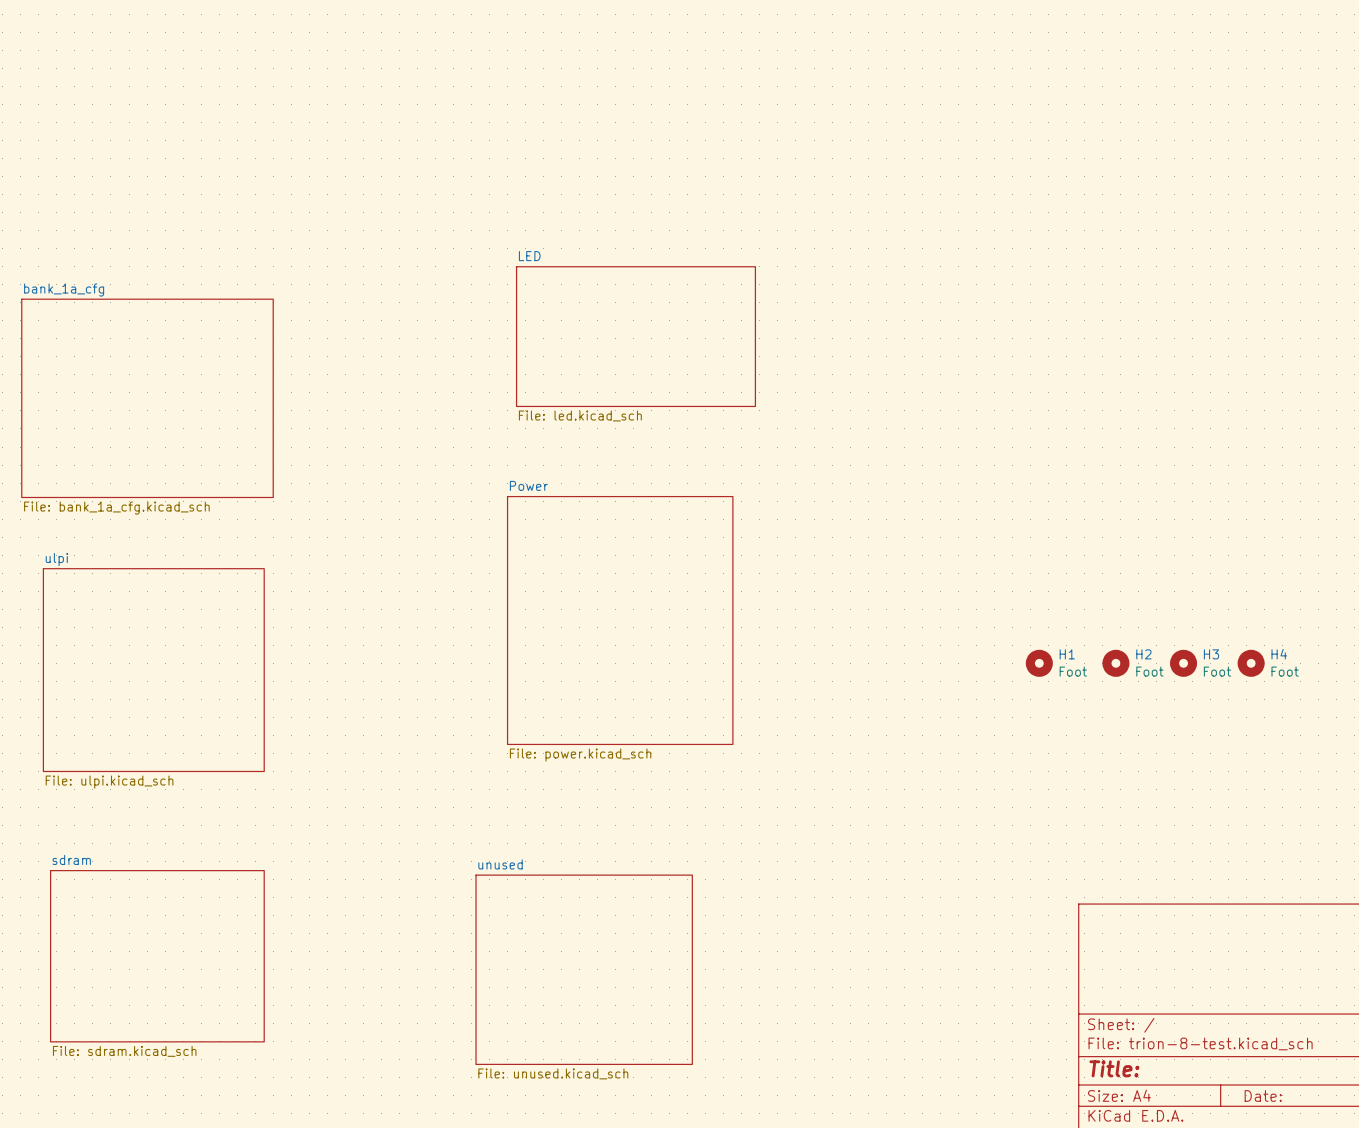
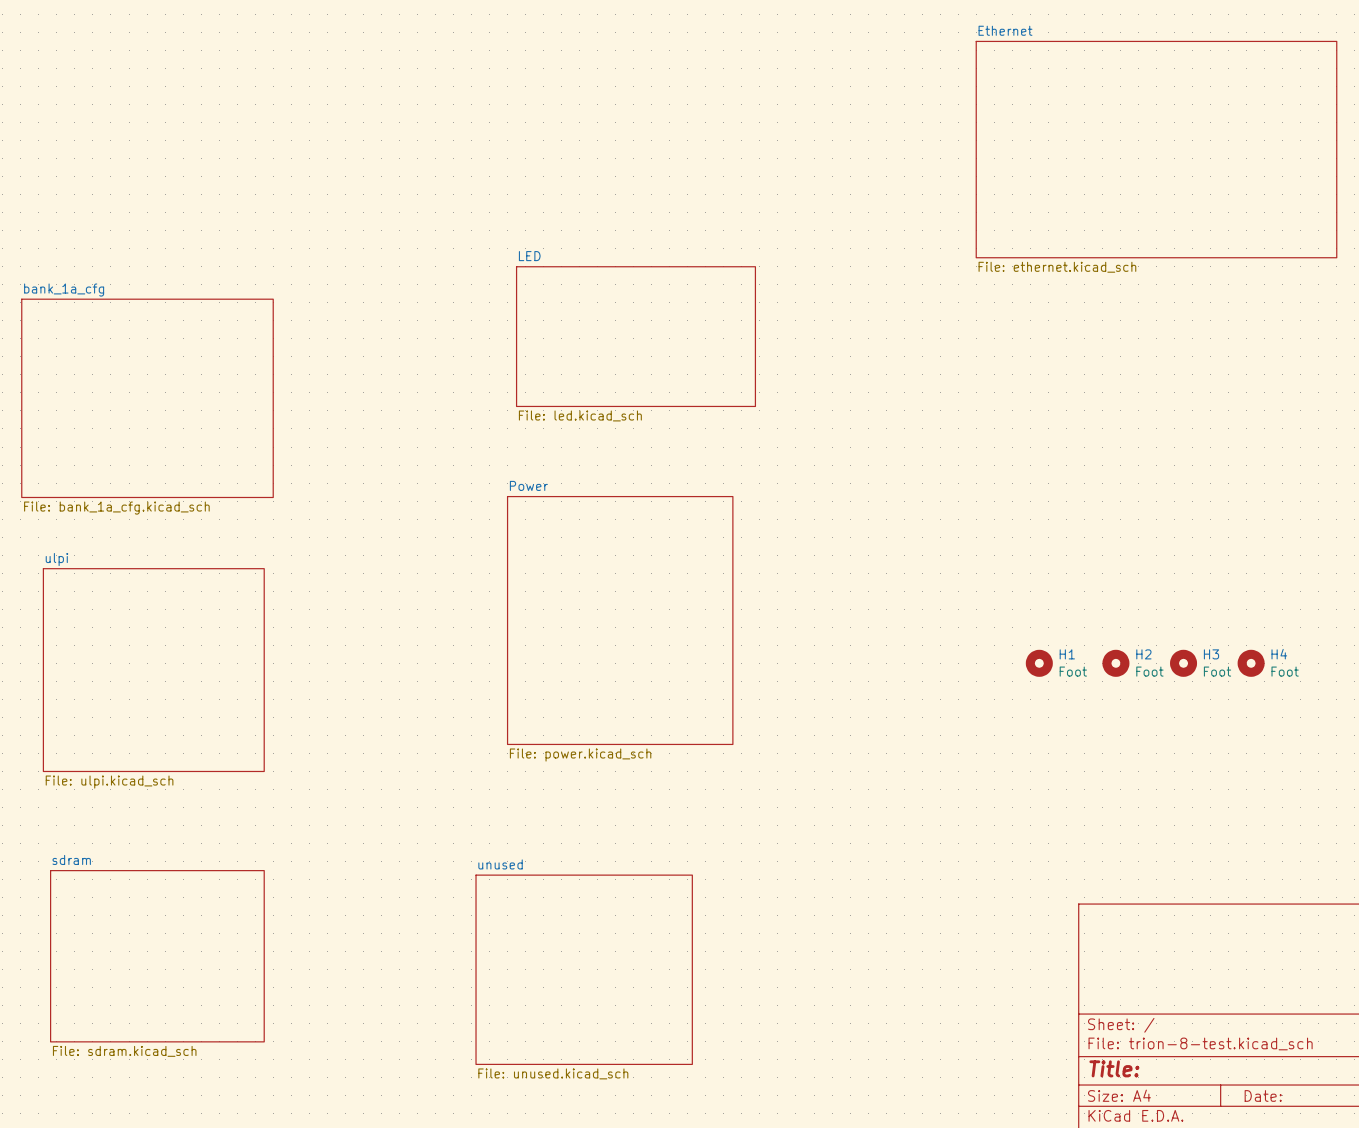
sheet Ethernet: none -> File: ethernet.kicad_sch (1156, 149)

